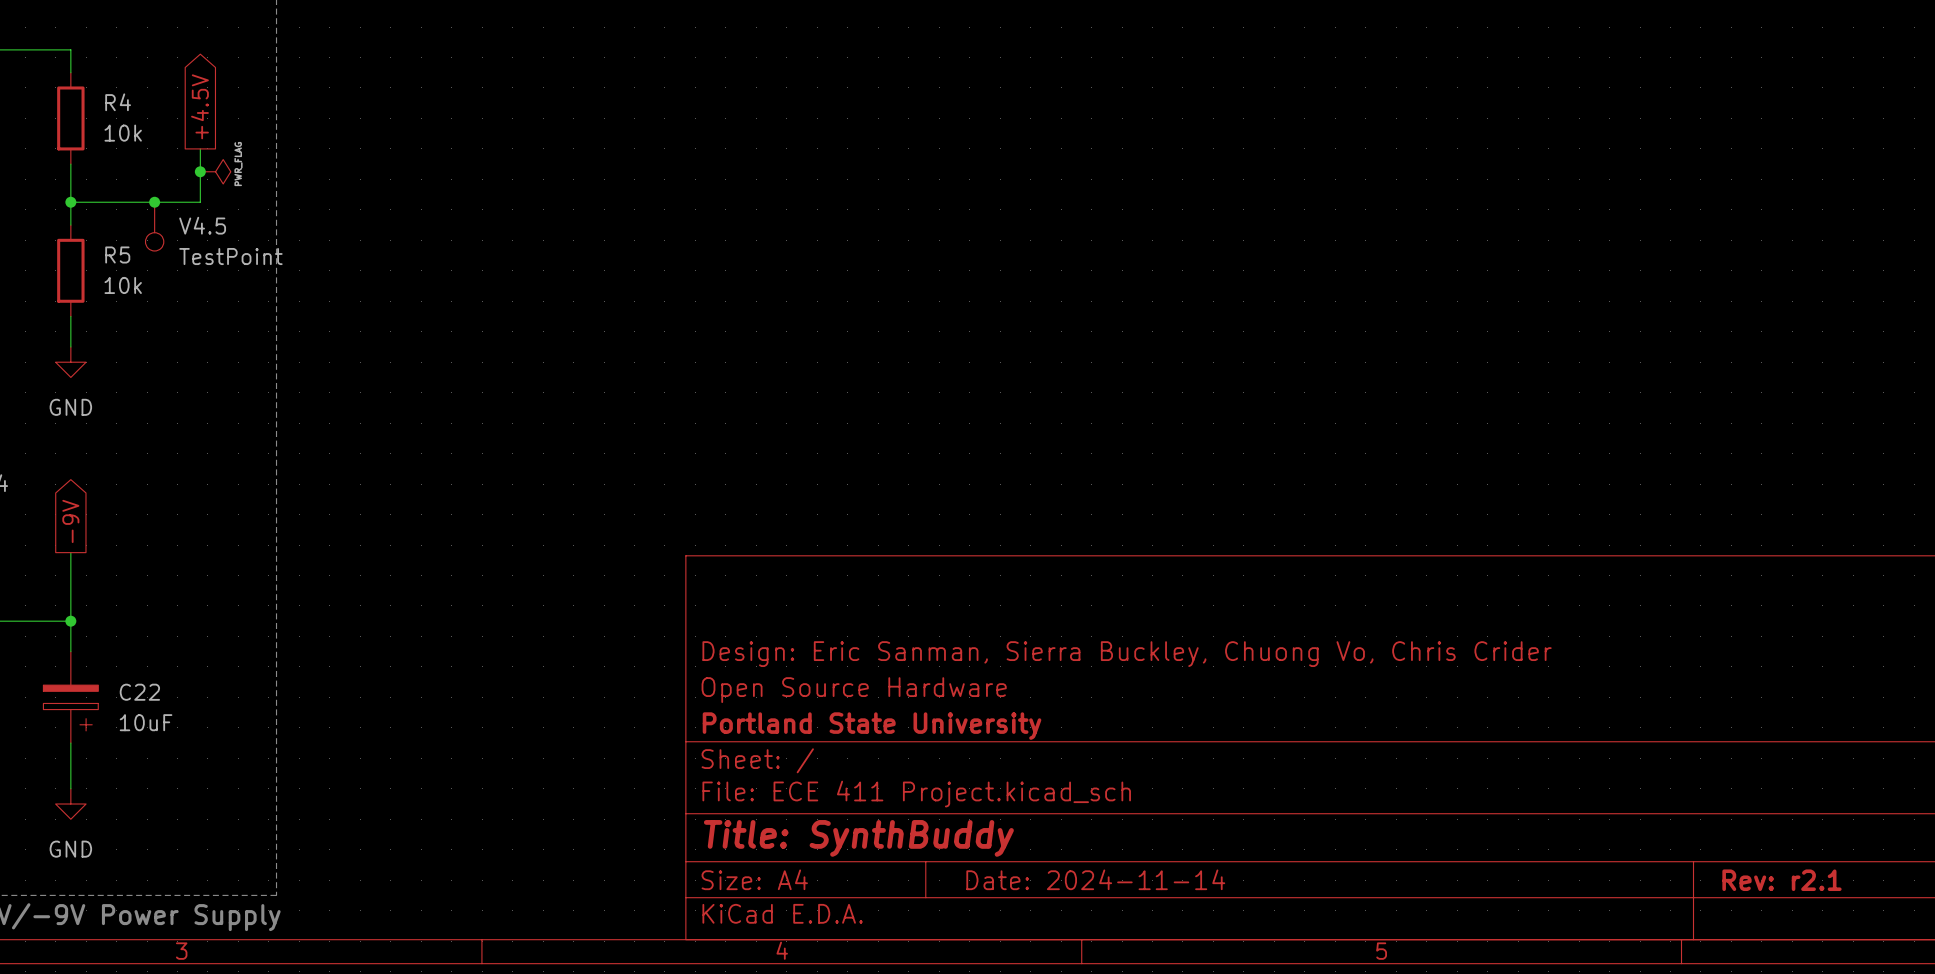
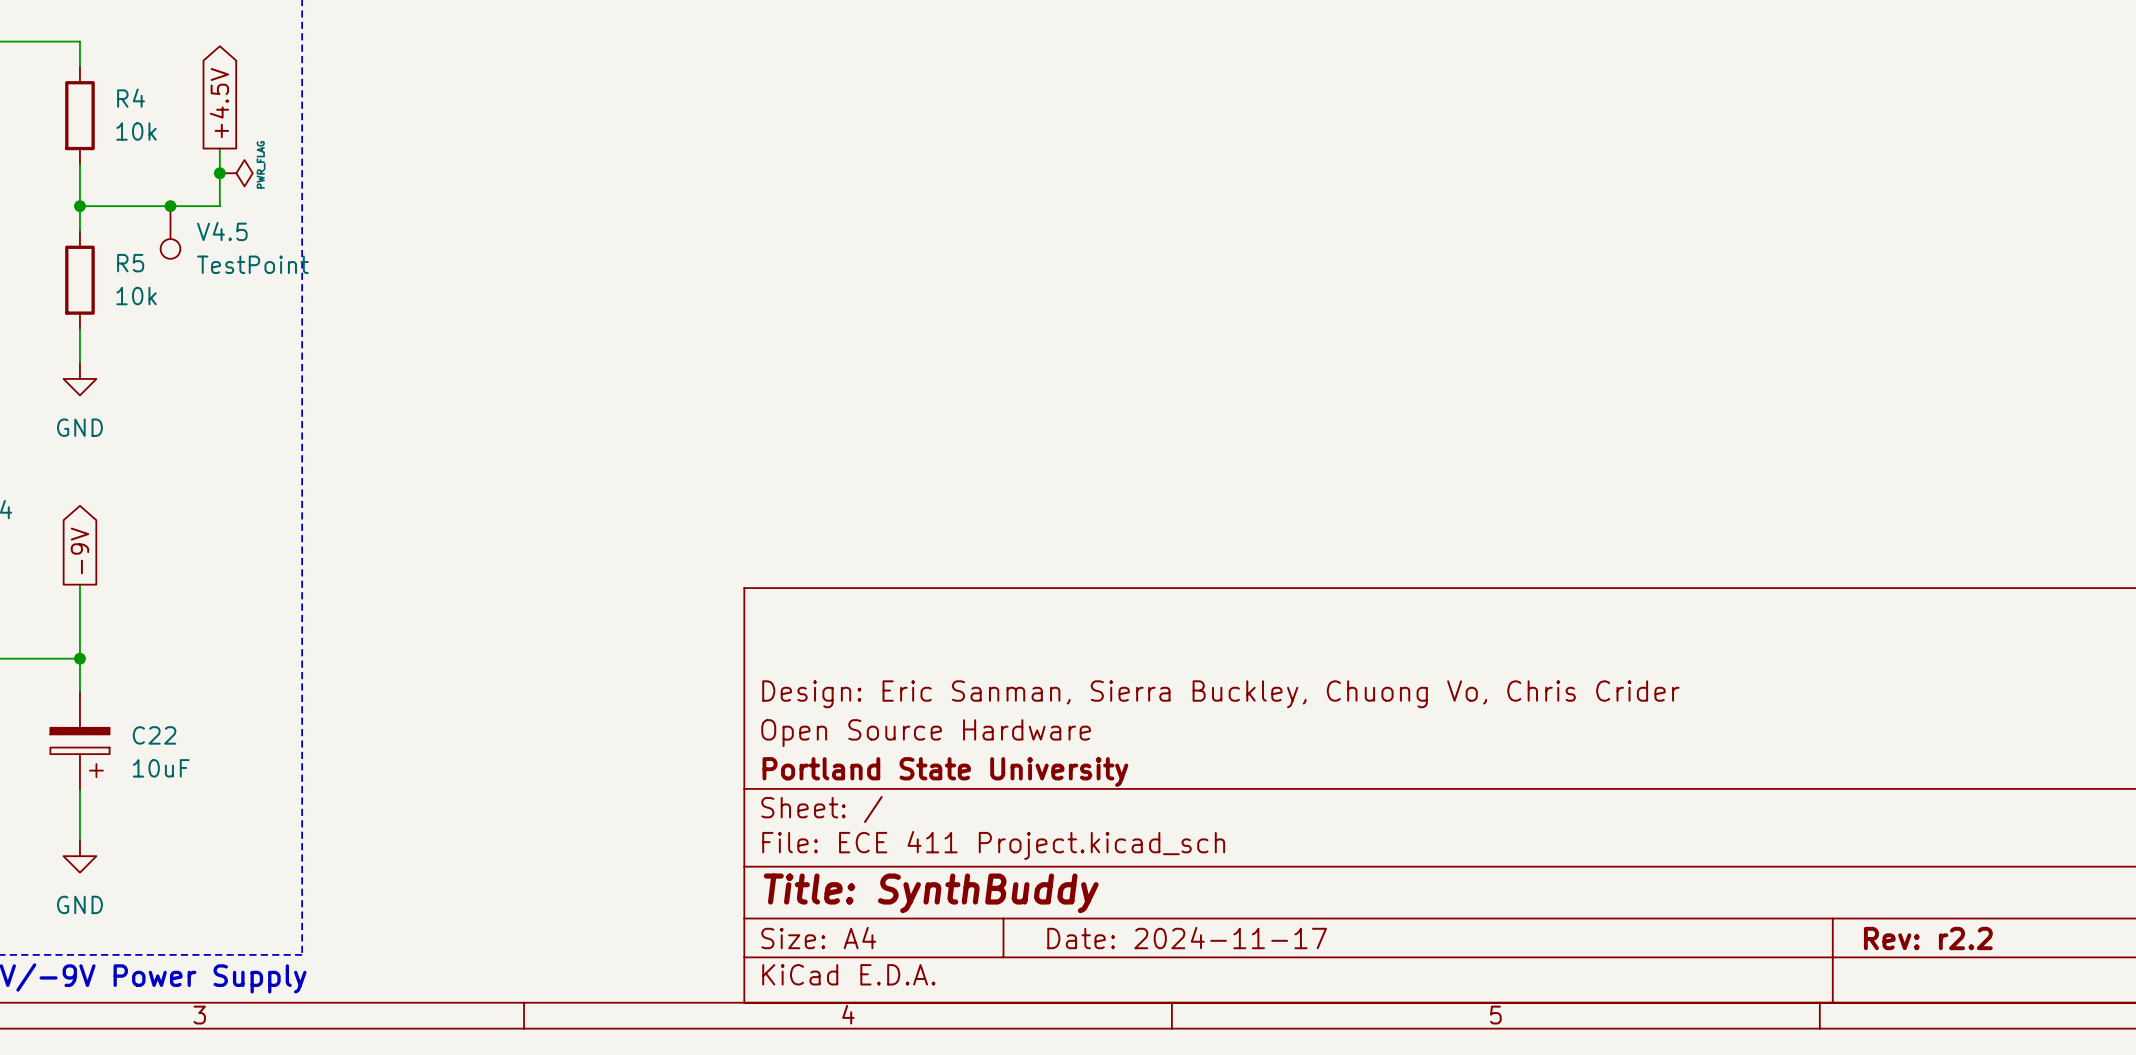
title block: Date: 2024-11-14 (1095, 879) -> Date: 2024-11-17 (1187, 938)
title block: Rev: r2.1 (1781, 880) -> Rev: r2.2 (1928, 938)

